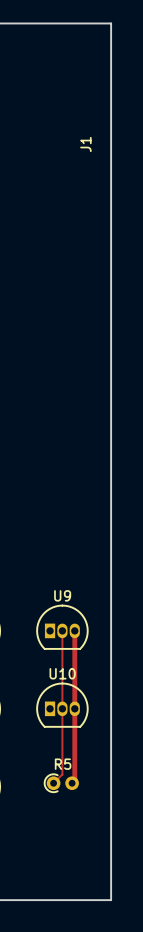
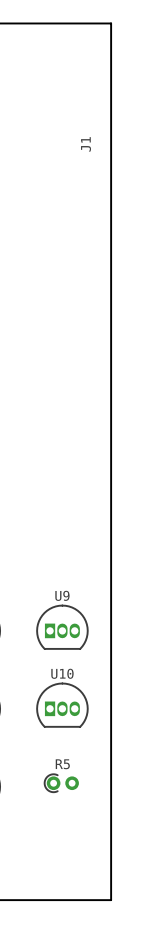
track: (62, 630) (62, 774) (53, 783) -> none
track: (74, 630) (74, 780) (72, 783) -> none

